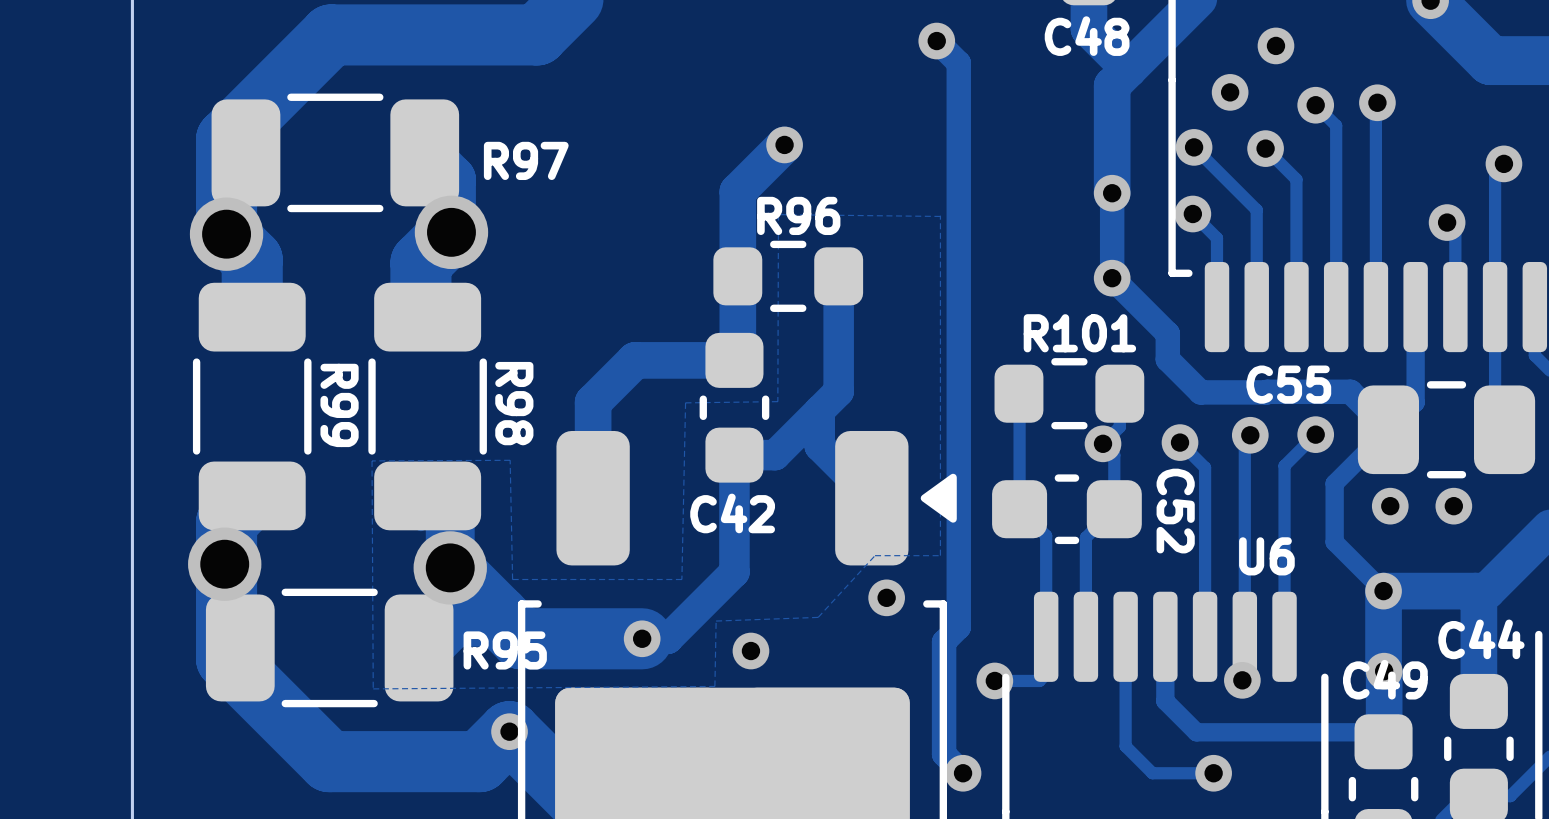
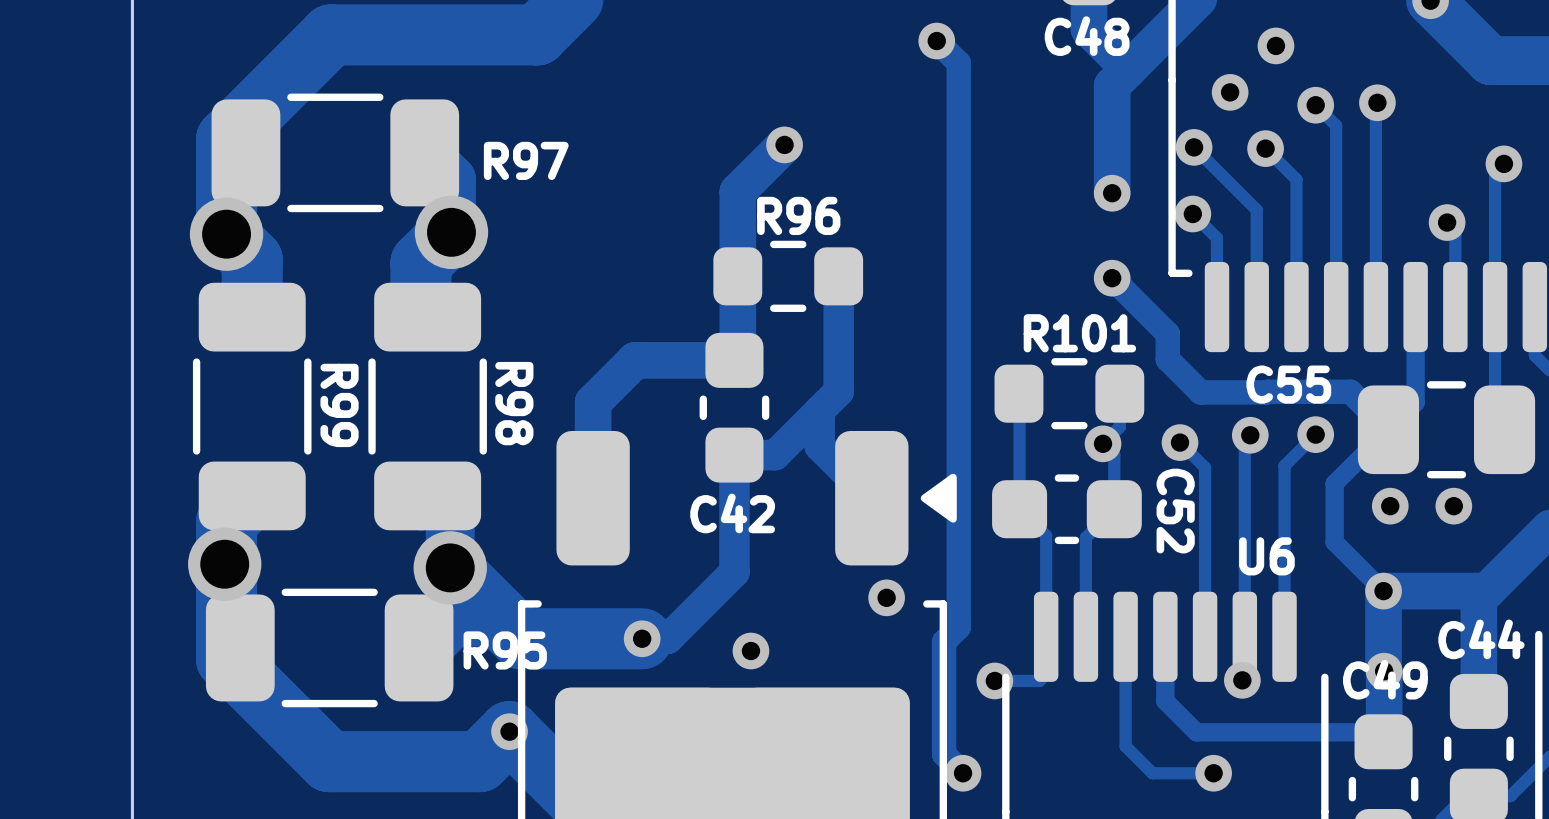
track: (1112, 193) (1112, 278) -> none
zone outline: (940, 215) (940, 555) (875, 555) (818, 617) (716, 621) (714, 686) (373, 688) (372, 460) (510, 460) (512, 579) (681, 579) (685, 402) (777, 401) (778, 214) (940, 216) -> none

